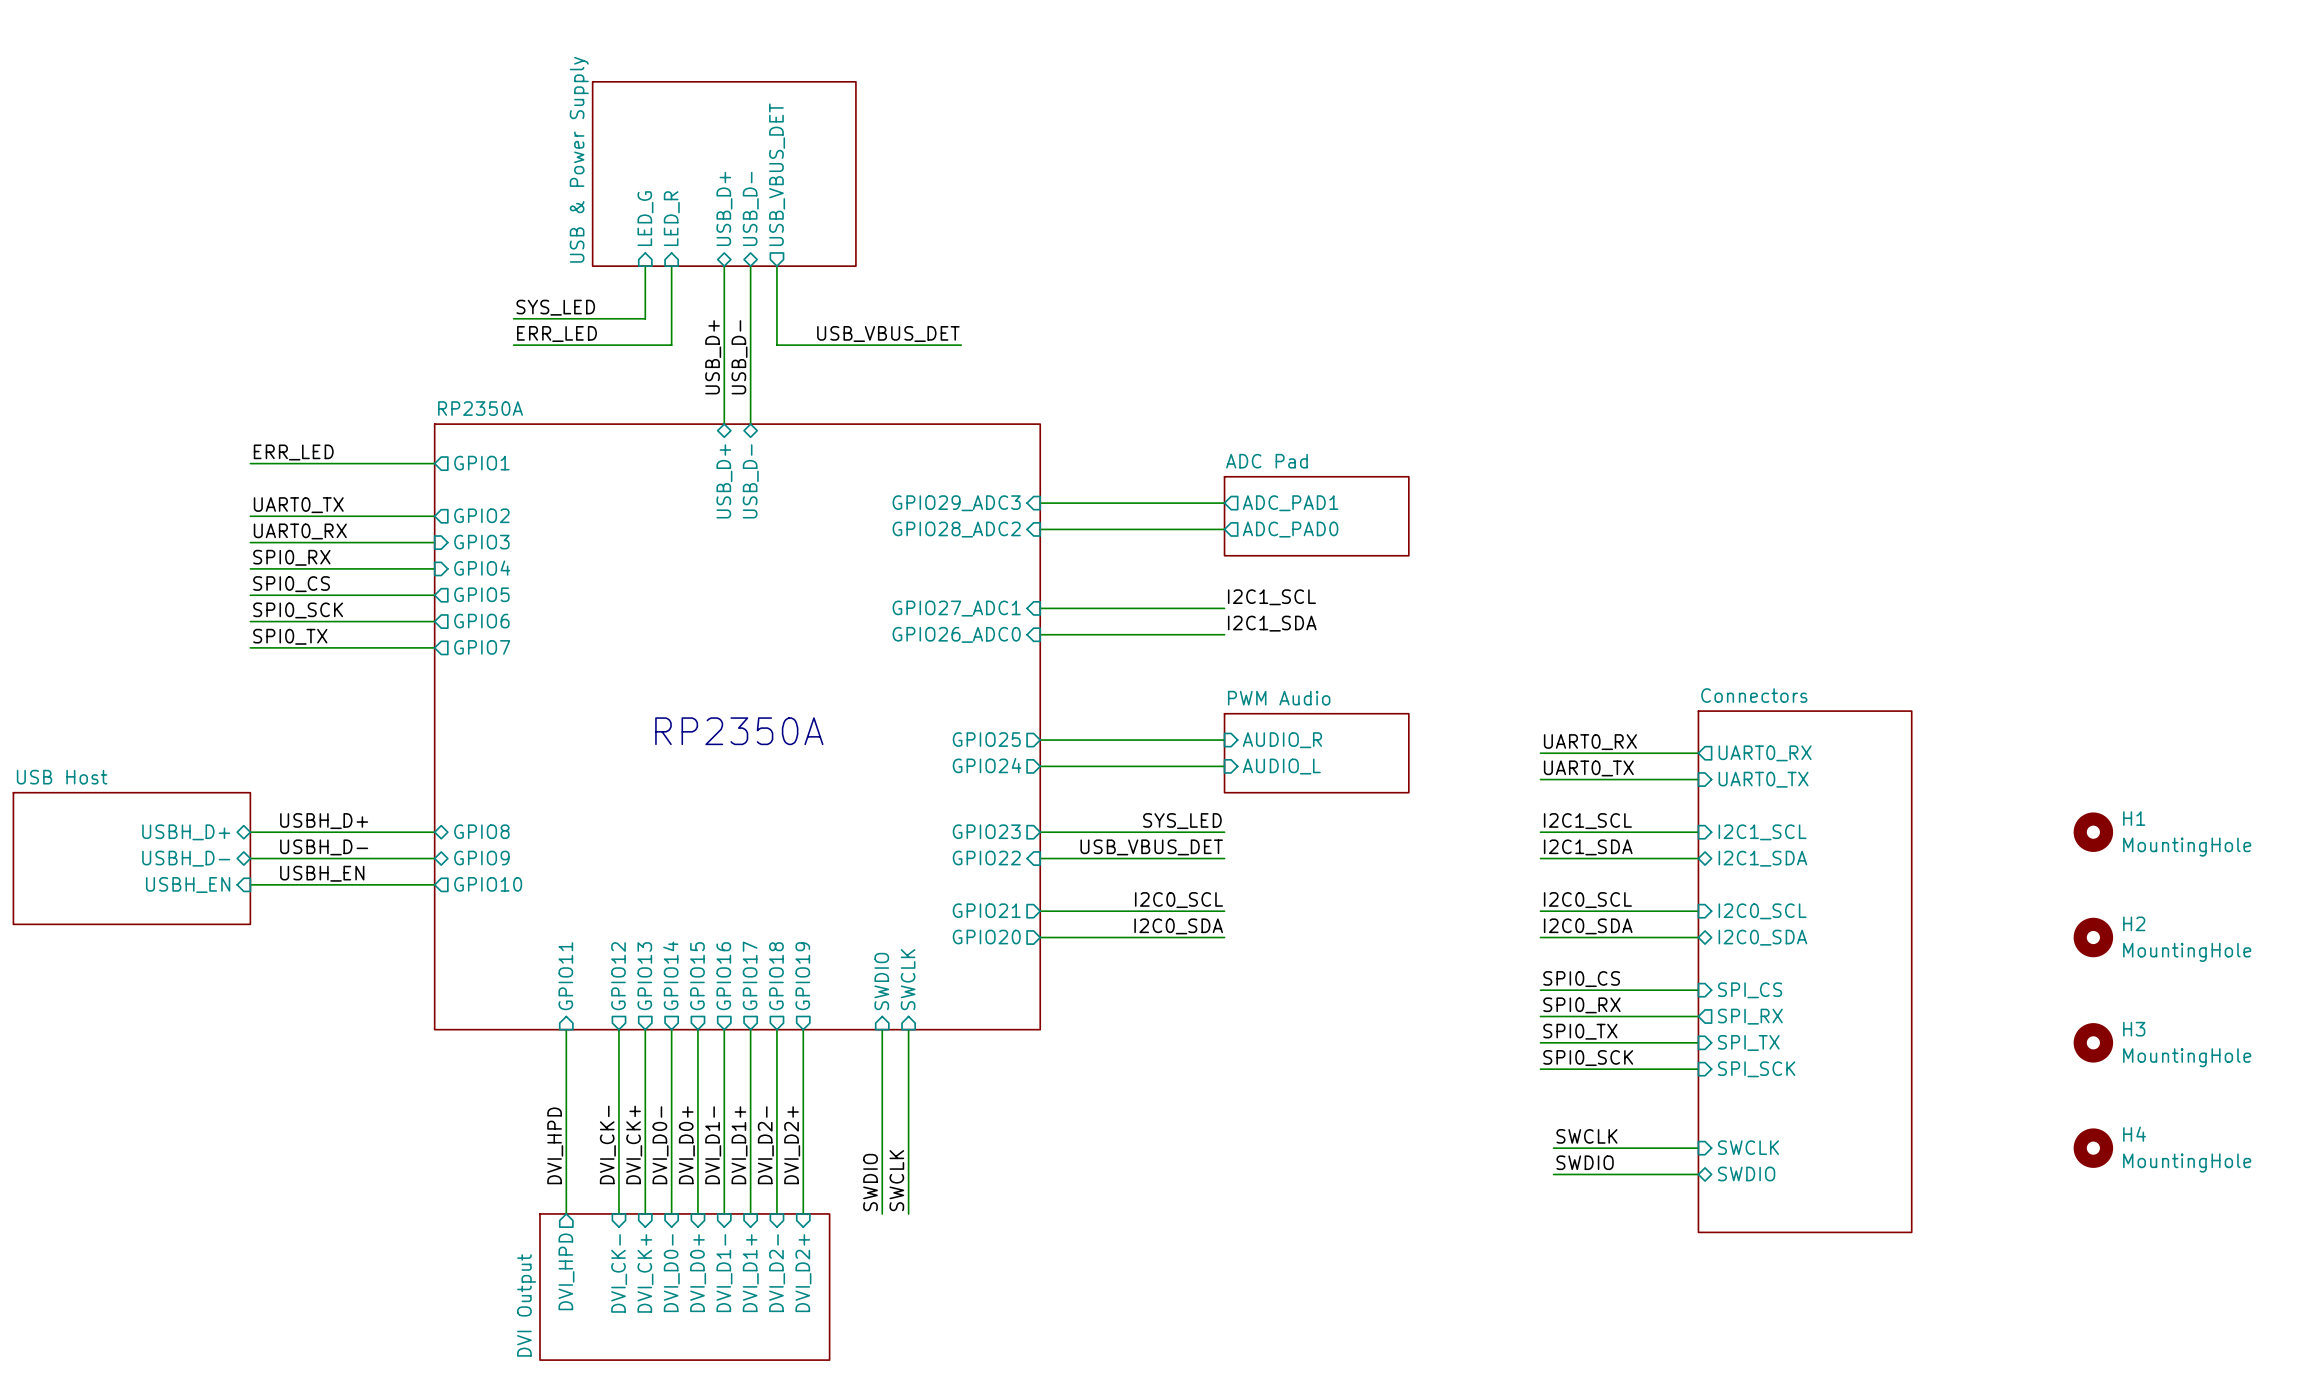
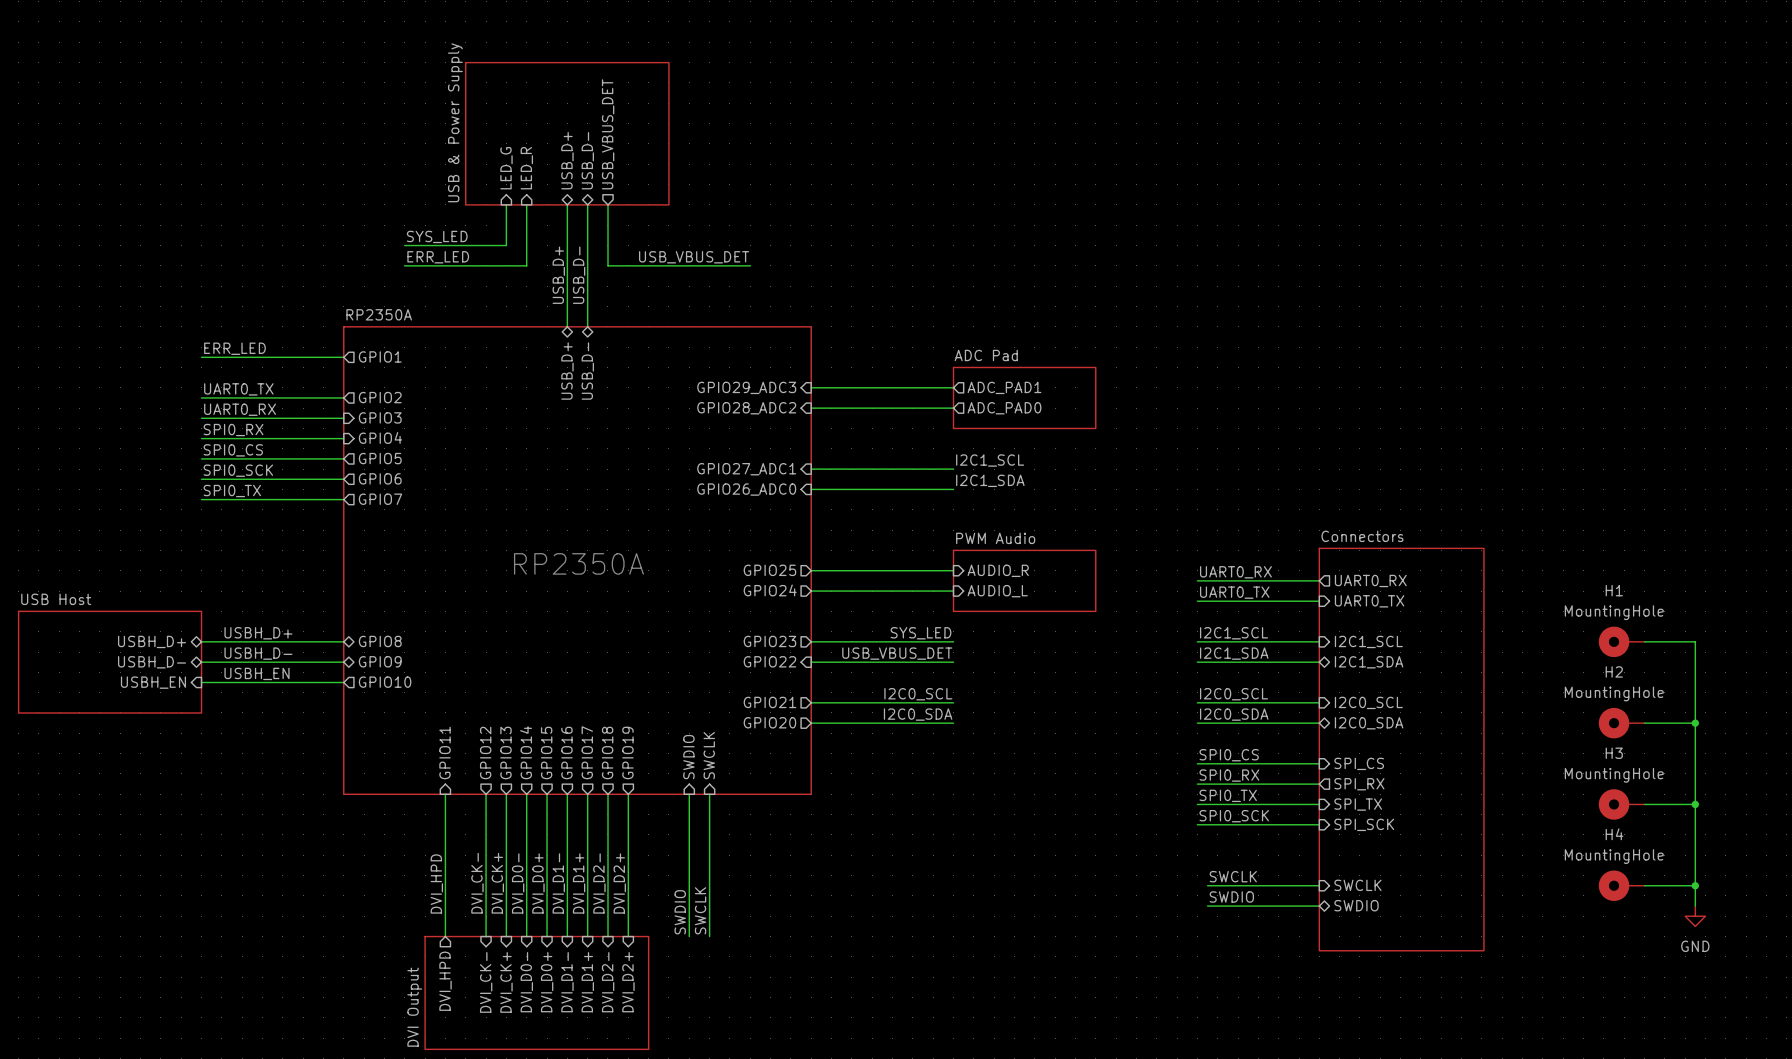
H1 symbol: [2073, 812, 2114, 852] -> [1598, 626, 1645, 658]
H1 name position: H1 (2134, 818) -> H1 (1614, 590)
wire: none -> (1644, 641) (1695, 641) (1695, 906)
H1 value position: MountingHole (2187, 847) -> MountingHole (1614, 612)
H2 symbol: [2073, 917, 2114, 958] -> [1598, 707, 1645, 739]
H2 name position: H2 (2134, 923) -> H2 (1614, 671)
wire: none -> (1644, 723) (1695, 723)
junction: none -> (1695, 723)
H2 value position: MountingHole (2187, 952) -> MountingHole (1614, 693)
H3 symbol: [2073, 1023, 2114, 1063] -> [1598, 789, 1645, 820]
H3 name position: H3 (2134, 1029) -> H3 (1614, 753)
wire: none -> (1644, 804) (1695, 804)
junction: none -> (1695, 804)
H3 value position: MountingHole (2187, 1057) -> MountingHole (1614, 775)
H4 symbol: [2073, 1128, 2114, 1168] -> [1598, 870, 1645, 901]
H4 name position: H4 (2134, 1134) -> H4 (1614, 834)
wire: none -> (1644, 885) (1695, 885)
junction: none -> (1695, 885)
H4 value position: MountingHole (2187, 1163) -> MountingHole (1614, 856)
power symbol: none -> GND (1695, 916)

